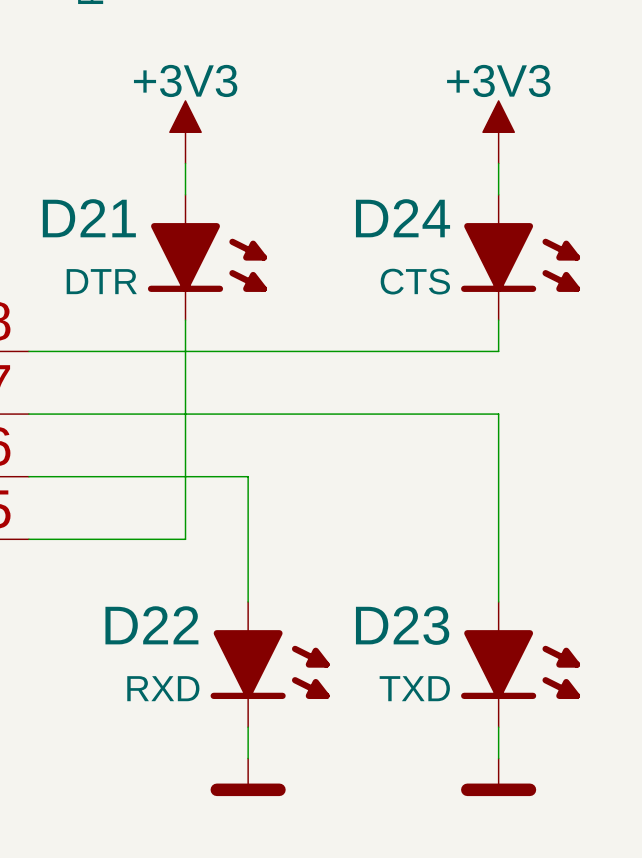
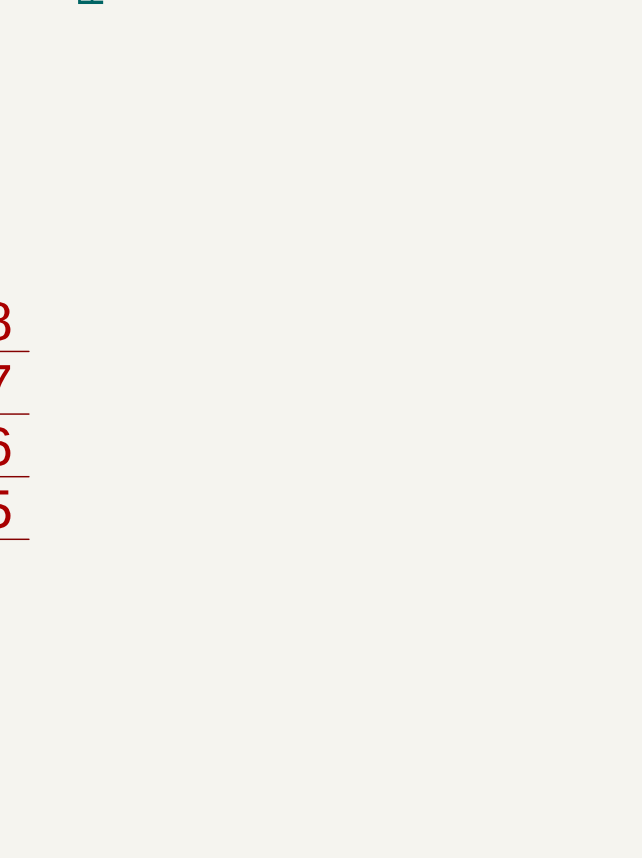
power symbol: +3V3 (185, 132) -> none
power symbol: +3V3 (498, 132) -> none
wire: (185, 163) (185, 194) -> none
wire: (498, 163) (498, 194) -> none
D21: DTR (207, 257) -> none
D24: CTS (520, 257) -> none
wire: (185, 320) (185, 539) (28, 539) -> none
wire: (498, 320) (498, 351) (28, 351) -> none
wire: (28, 414) (498, 414) (498, 601) -> none
wire: (28, 476) (248, 476) (248, 601) -> none
D22: RXD (270, 664) -> none
D23: TXD (520, 664) -> none
wire: (248, 727) (248, 758) -> none
wire: (498, 727) (498, 758) -> none
power symbol: (248, 777) -> none
power symbol: (498, 777) -> none

